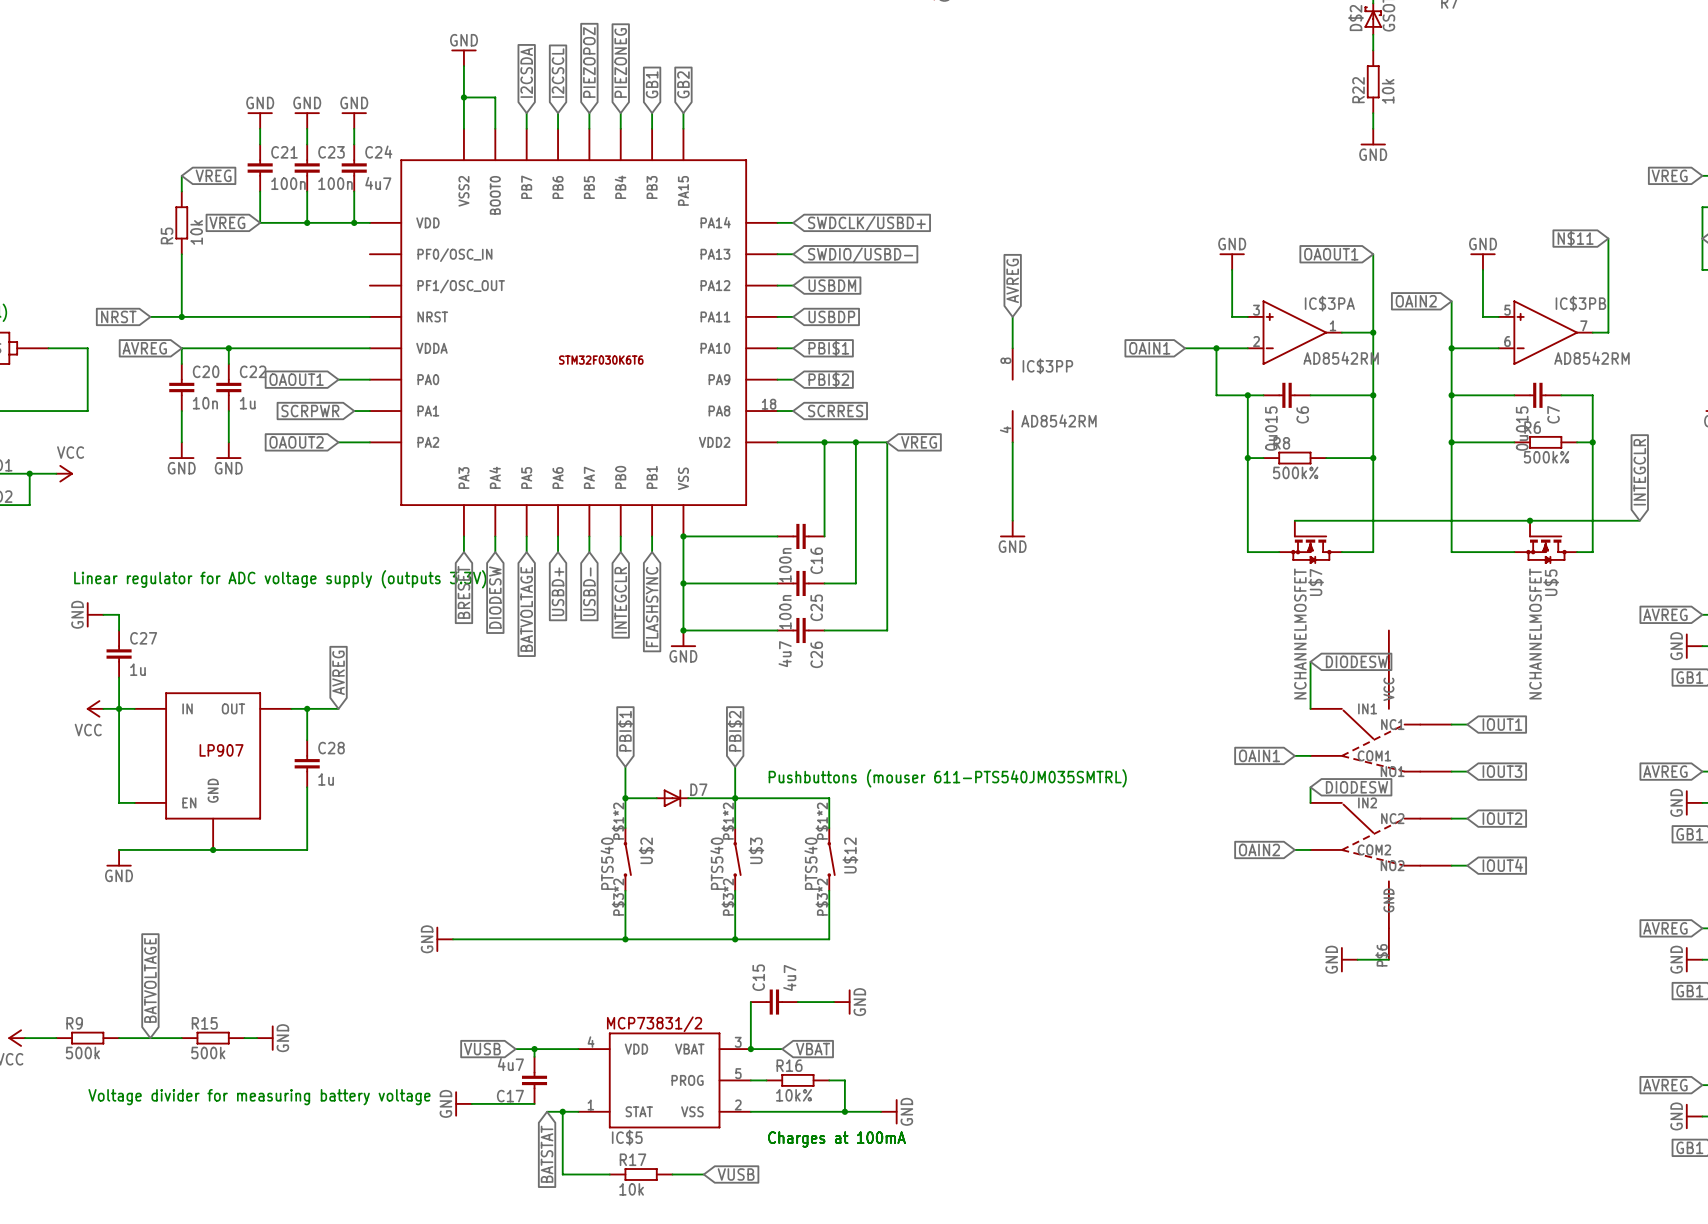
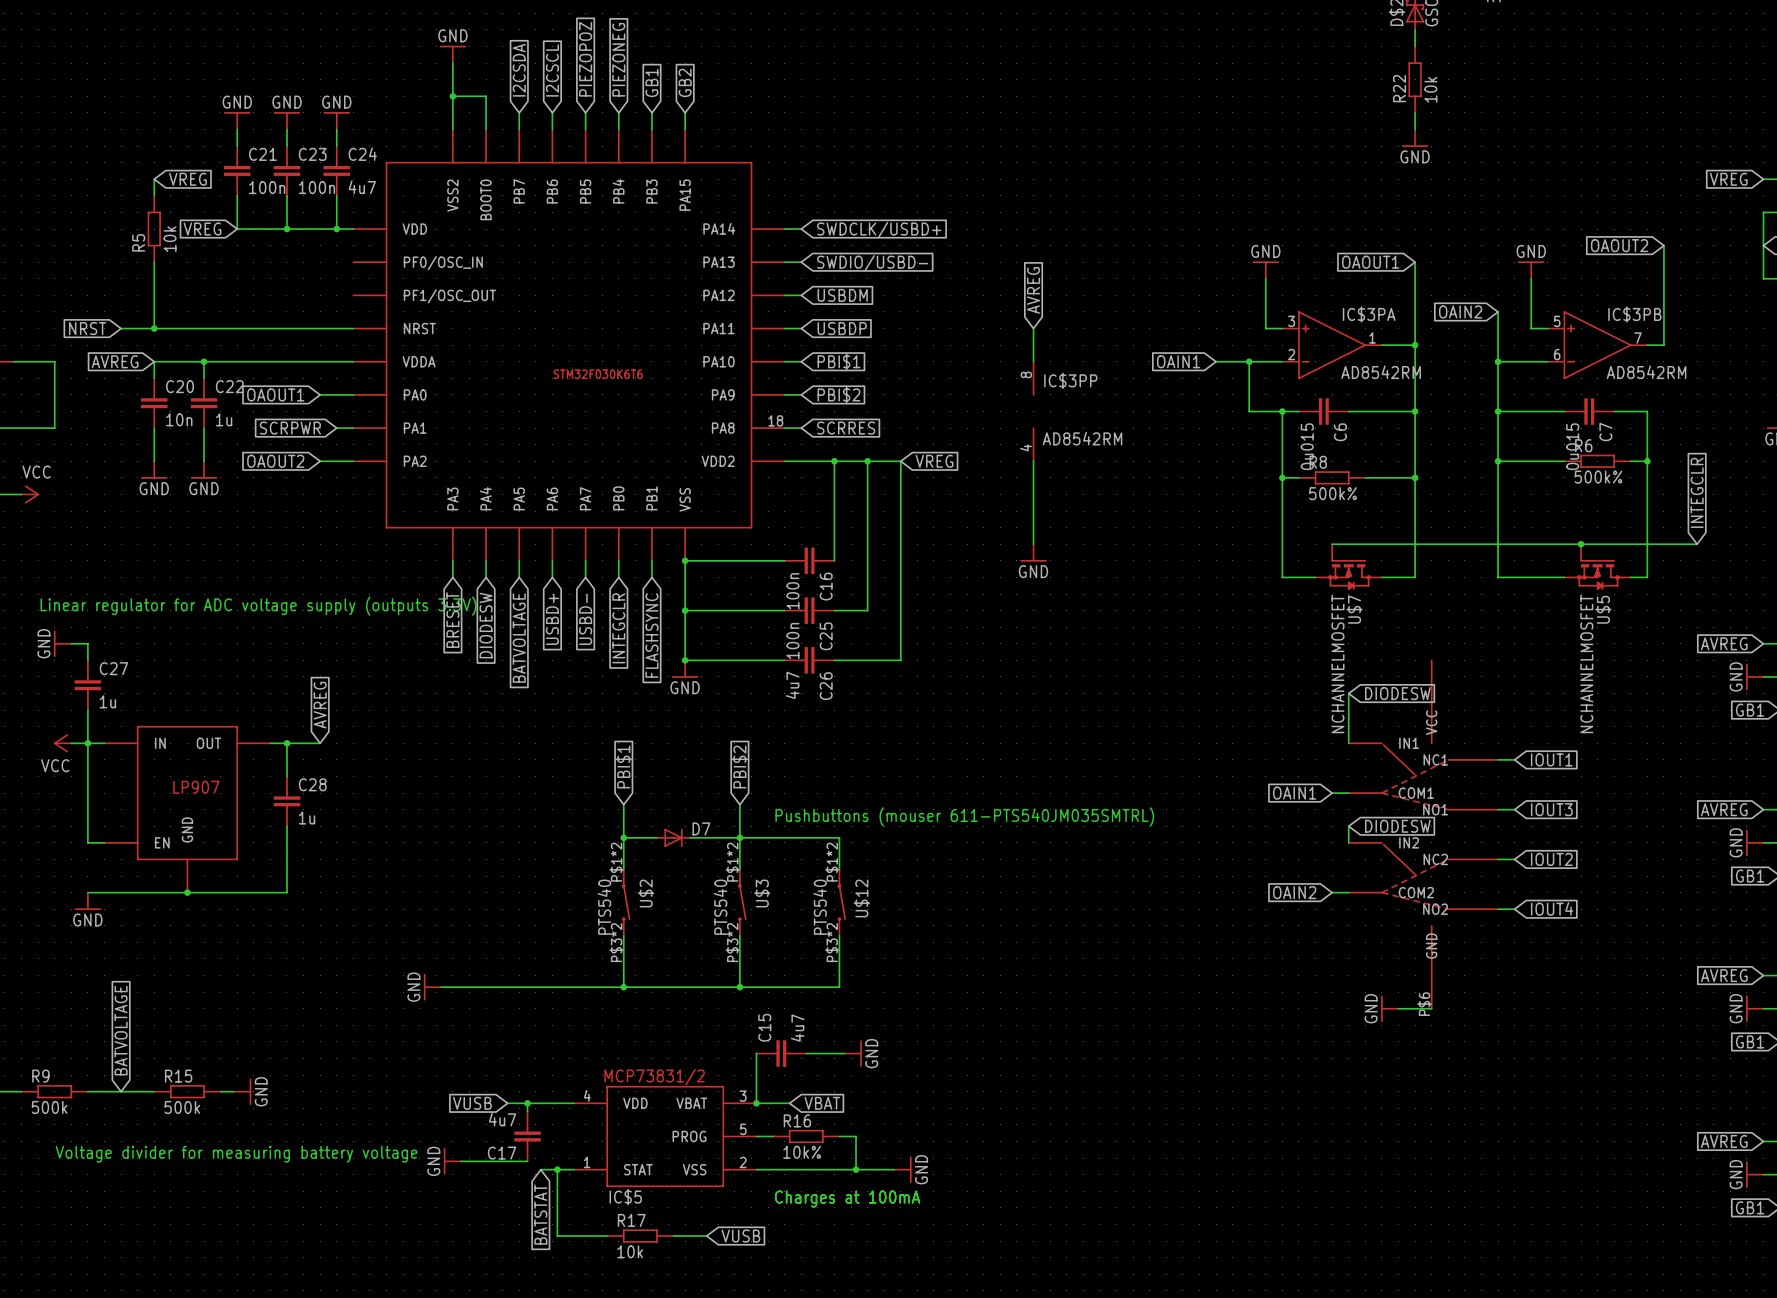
global label: N$11 (1575, 238) -> OAOUT2 (1619, 245)

